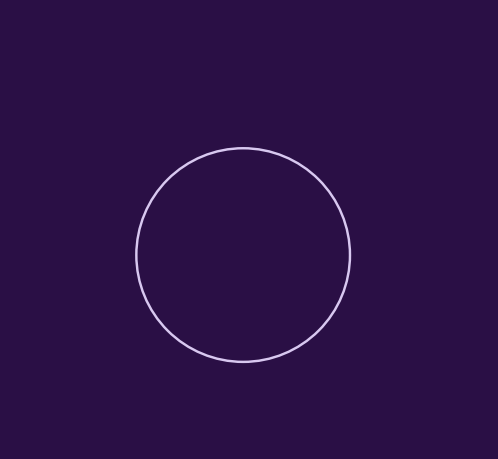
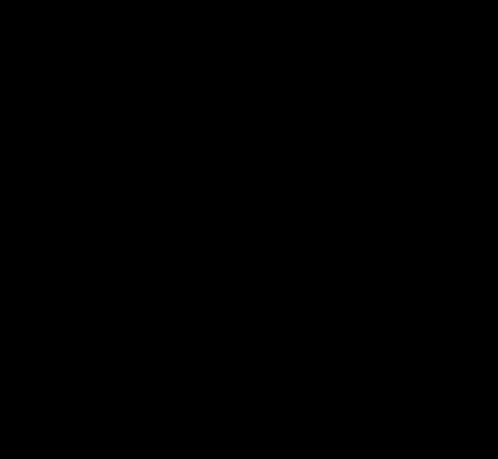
round board edge: [135, 147, 352, 364] -> none

